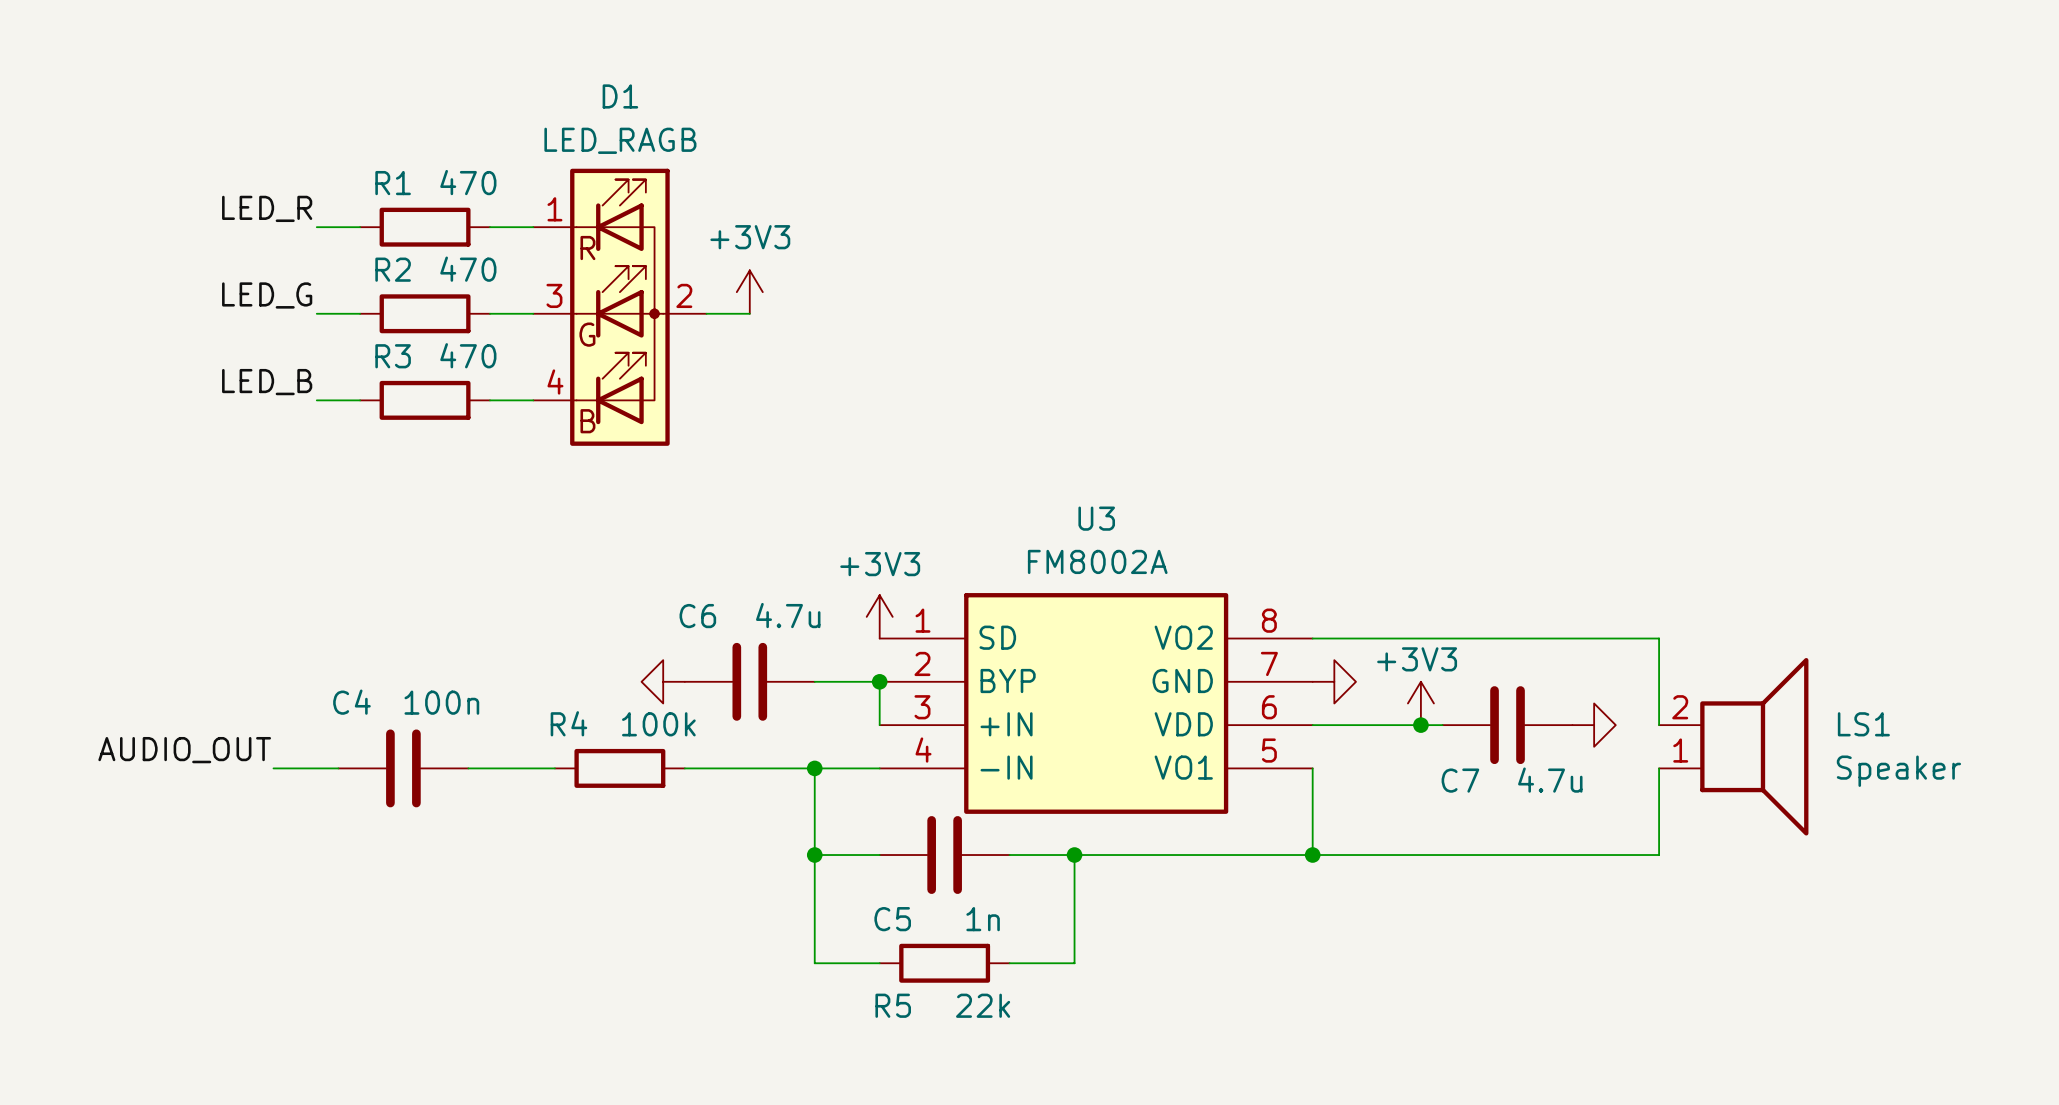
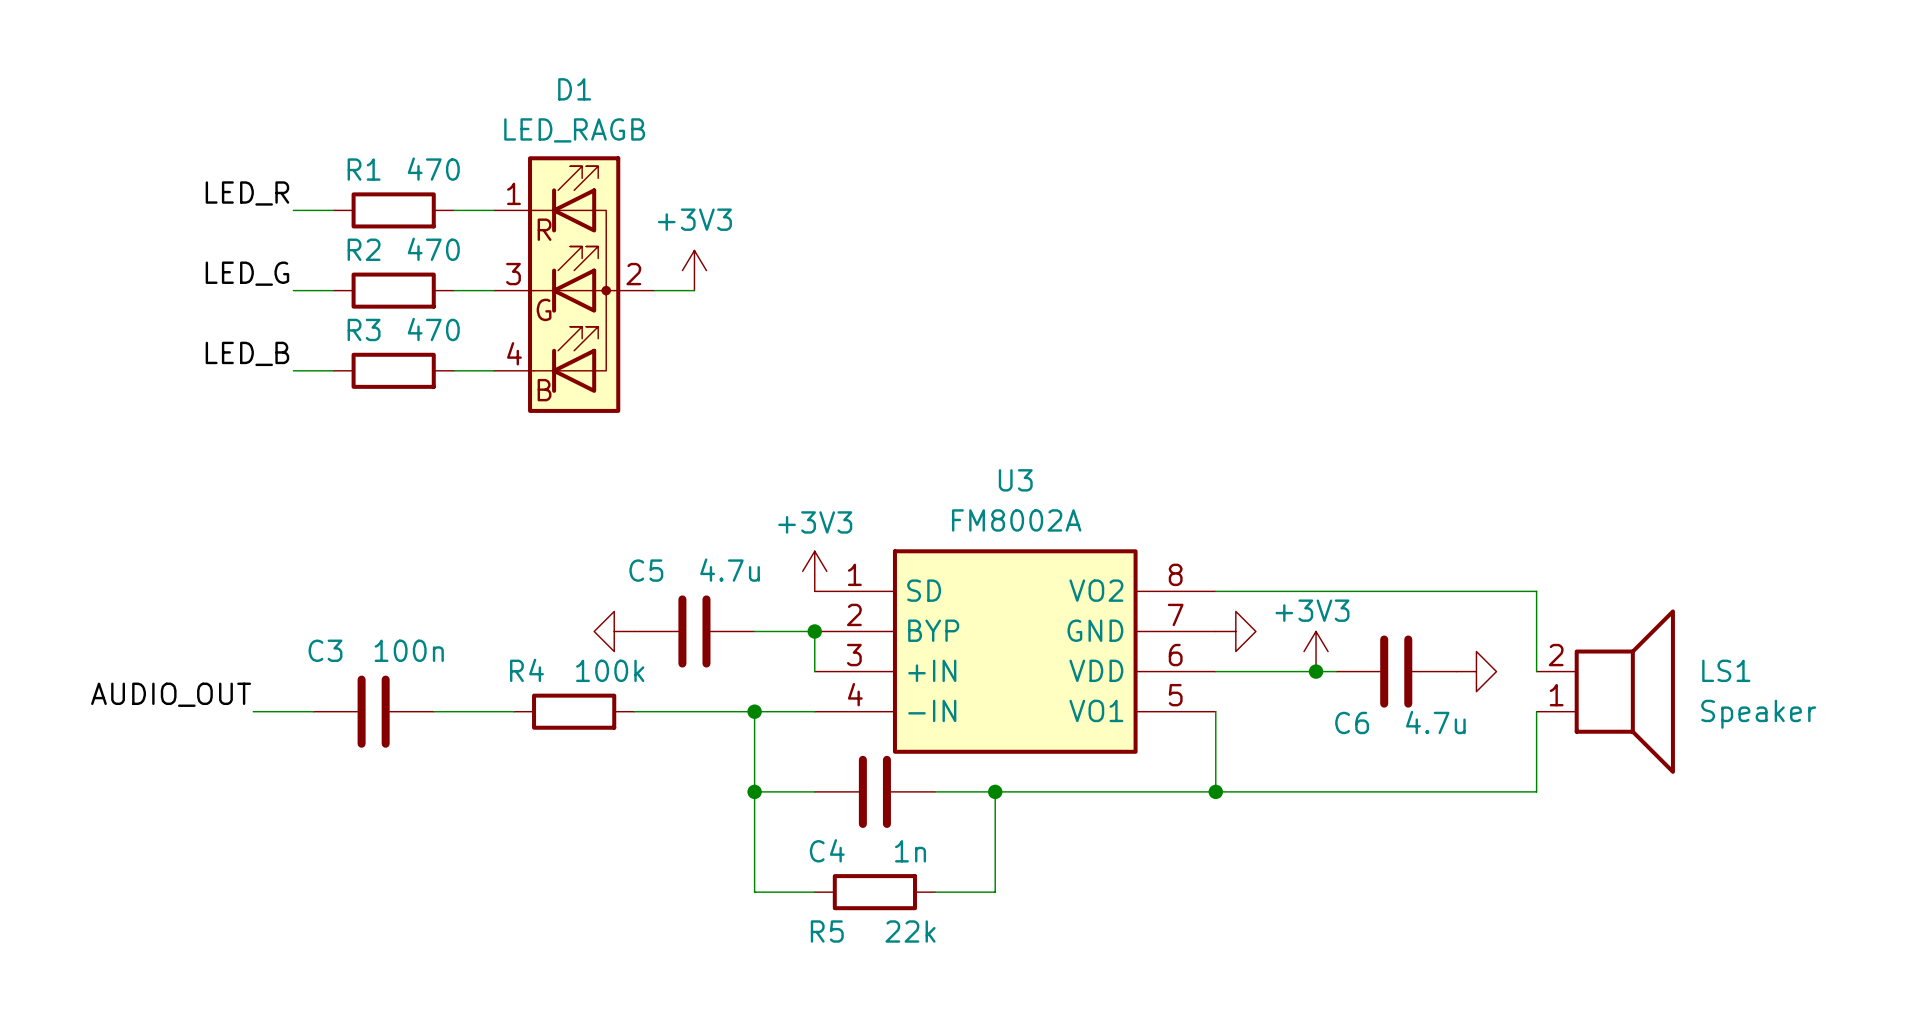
C6 name: C6 (697, 616) -> C5 (646, 570)
C4 name: C4 (351, 702) -> C3 (325, 650)
C7 name: C7 (1460, 780) -> C6 (1352, 722)
C5 name: C5 (892, 919) -> C4 (827, 850)

